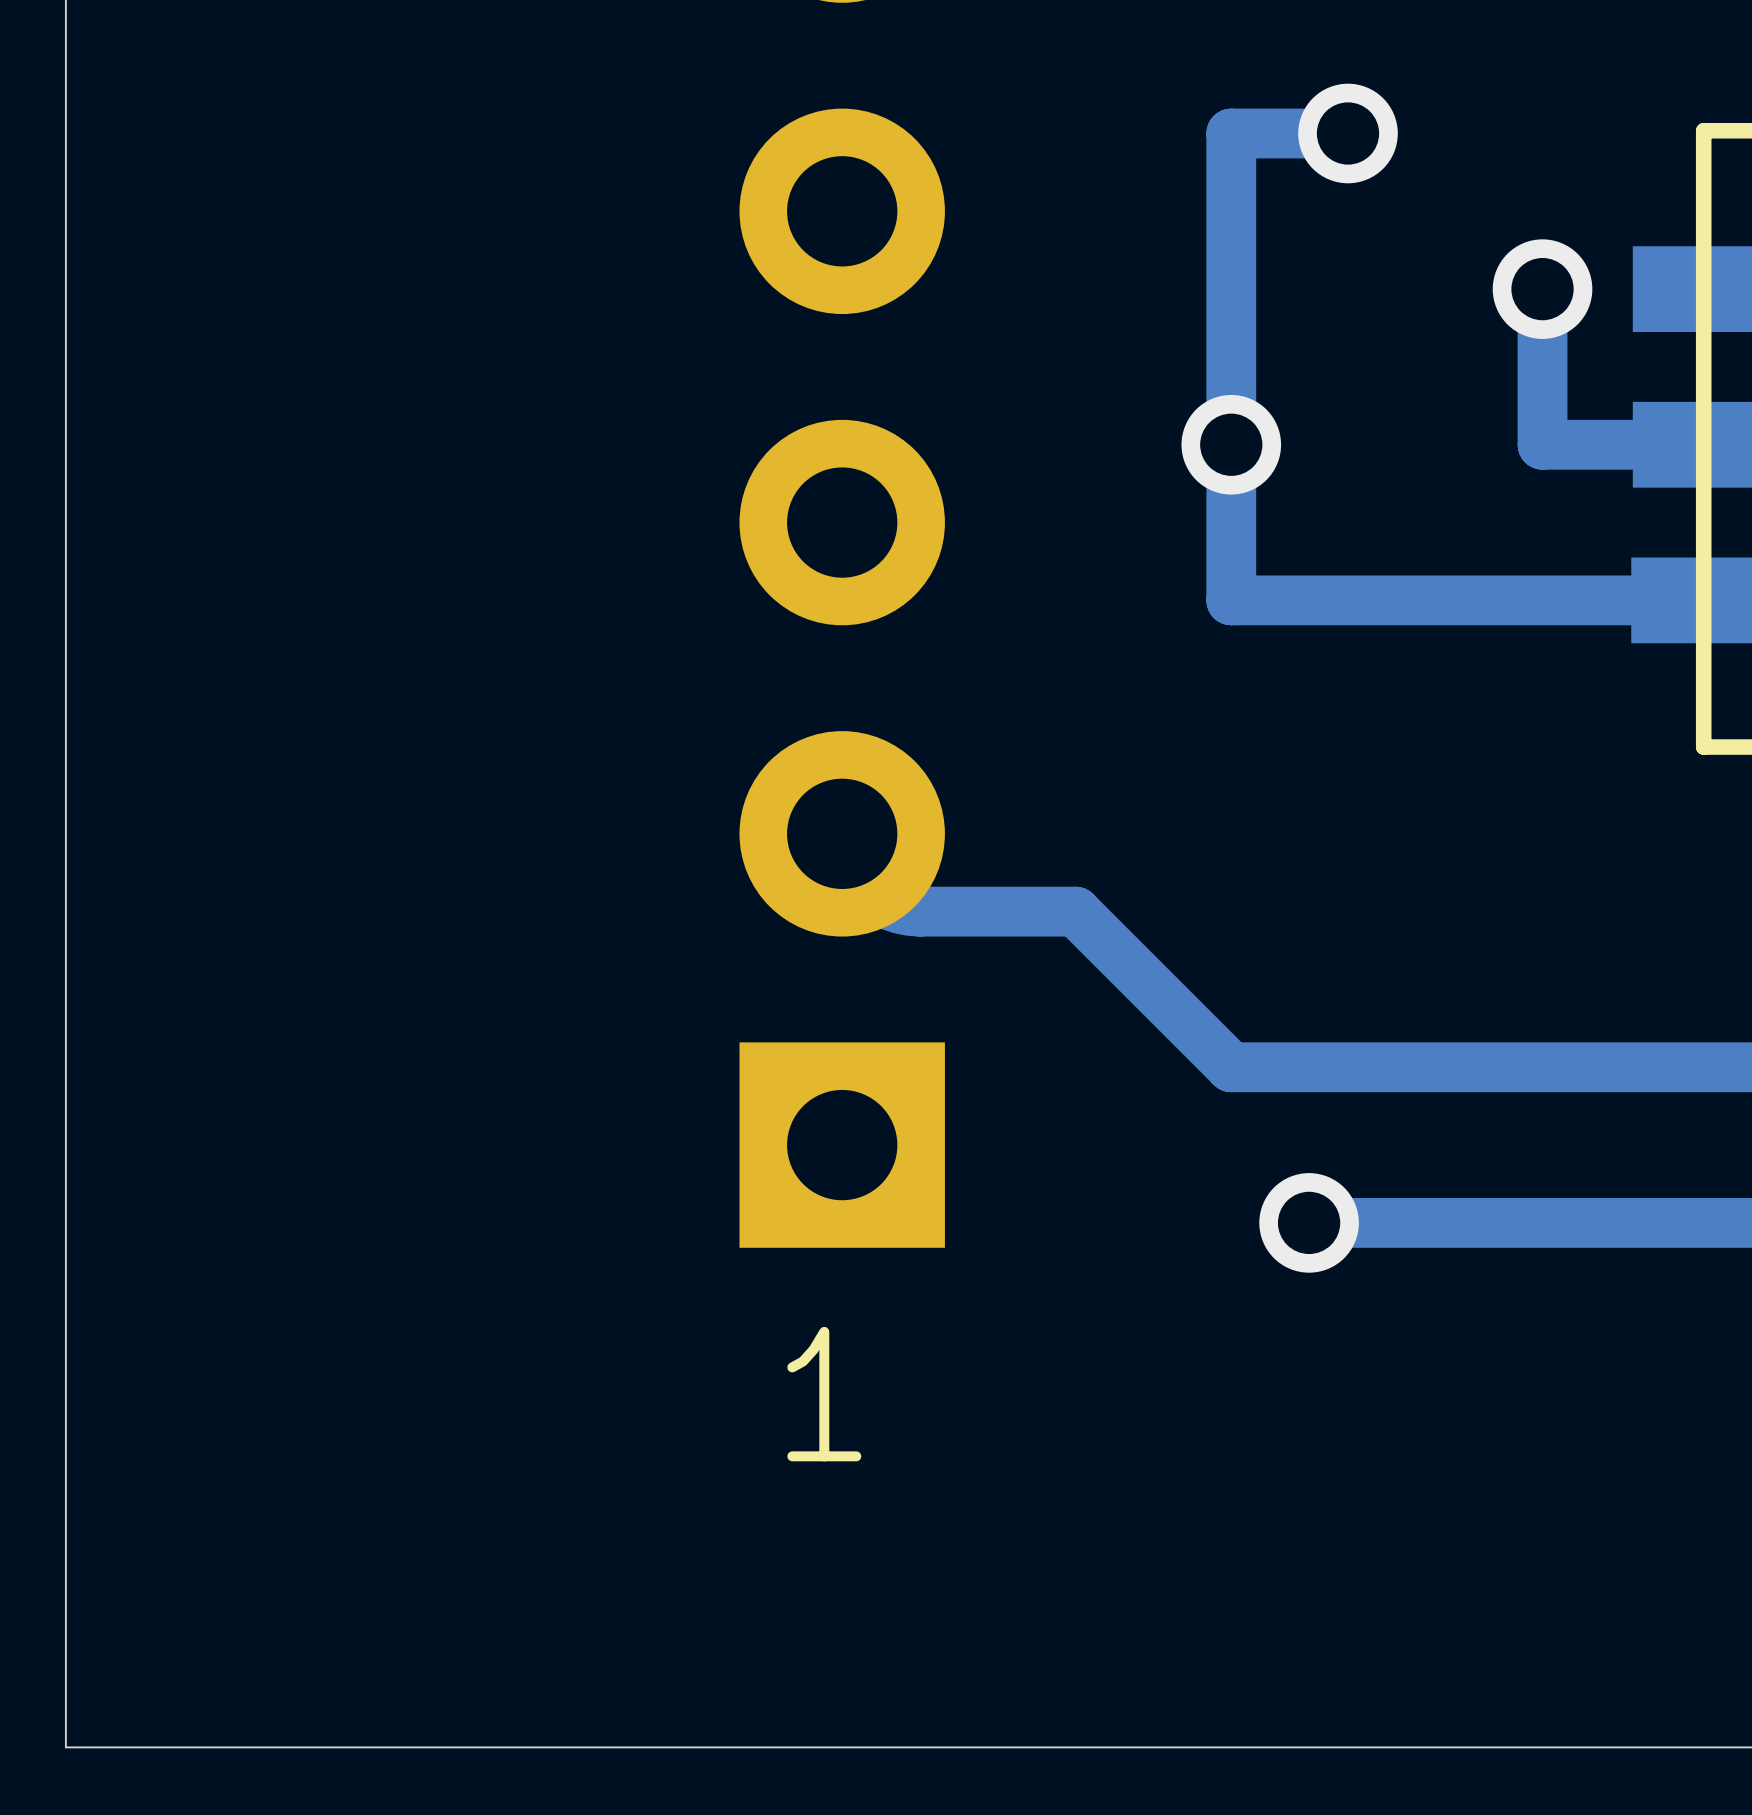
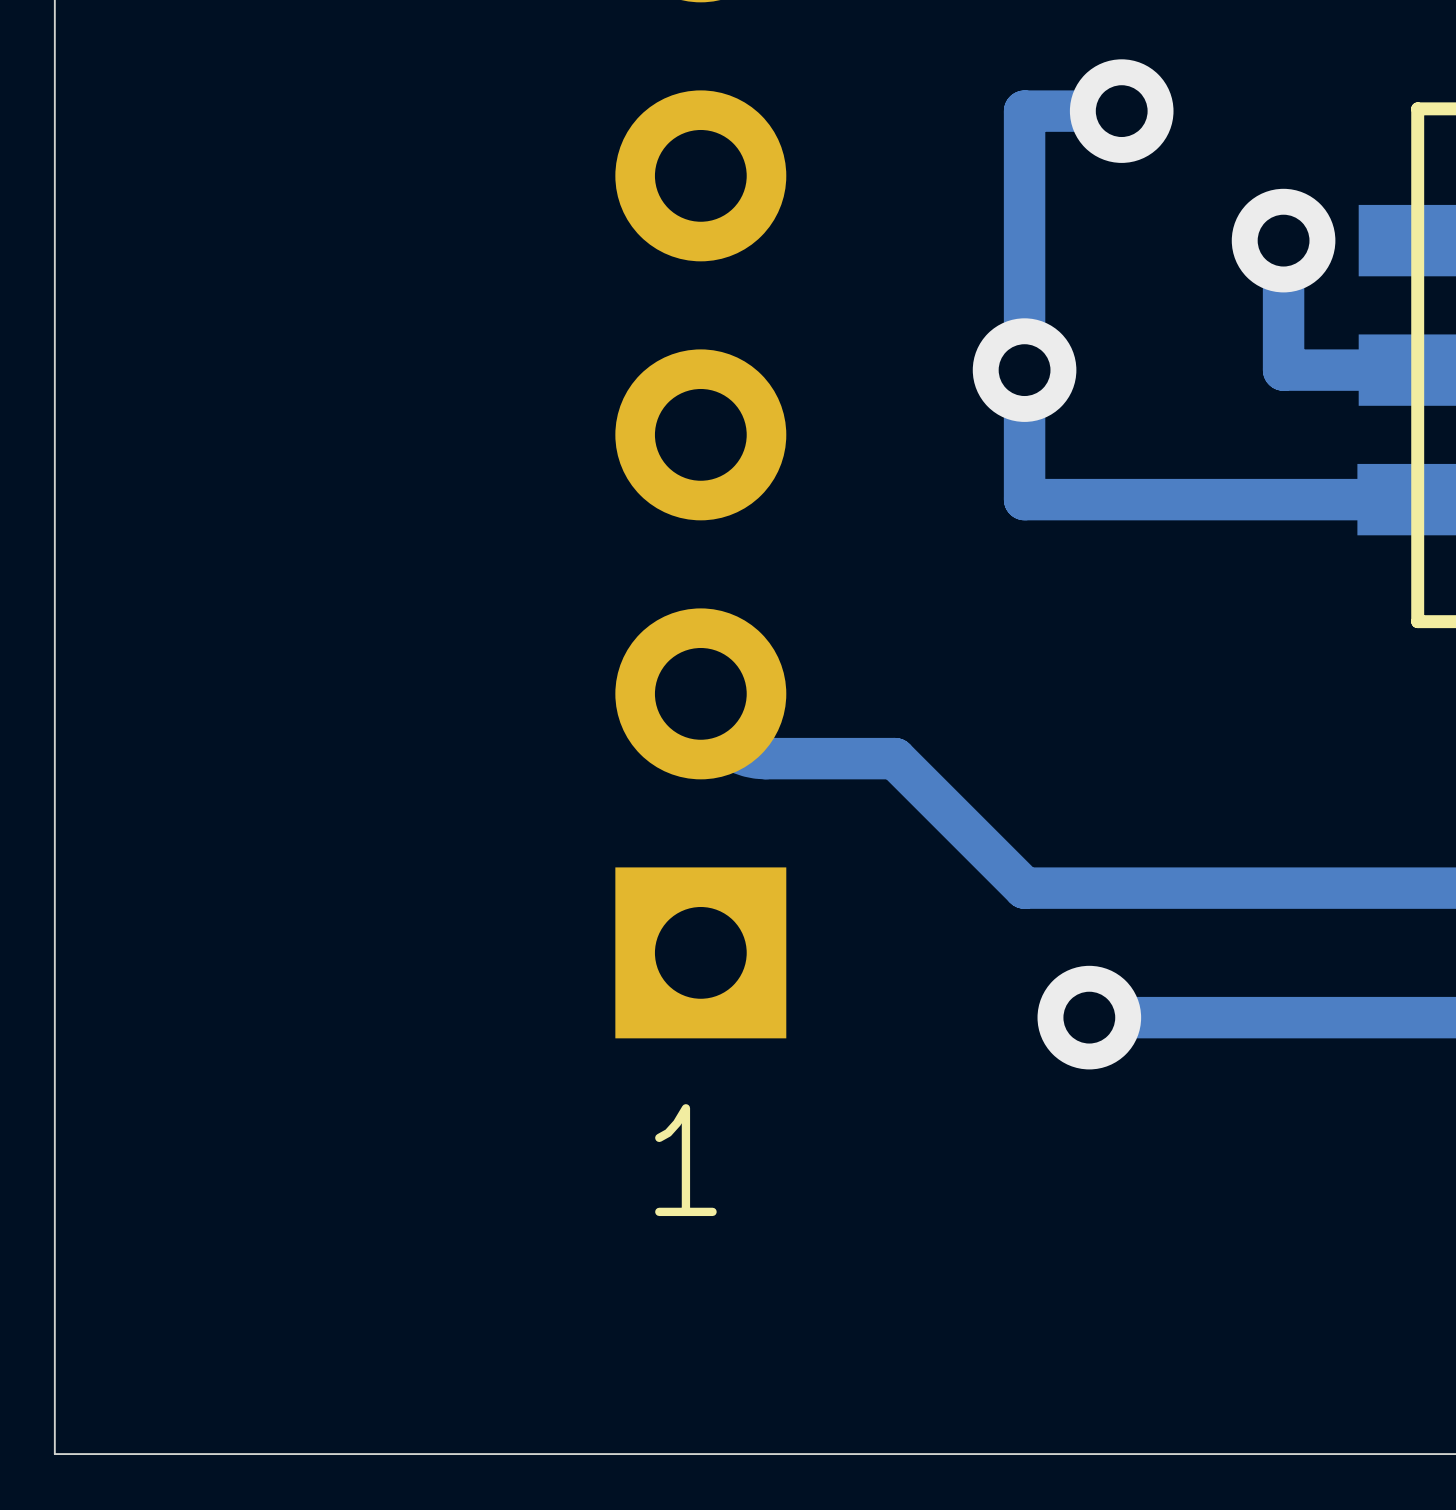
via size: [1298, 83, 1398, 184] -> [1069, 59, 1174, 163]
via size: [1492, 239, 1593, 339] -> [1231, 188, 1336, 293]
via size: [1181, 394, 1282, 495] -> [972, 318, 1077, 422]
via size: [1259, 1173, 1359, 1273] -> [1037, 965, 1142, 1070]

